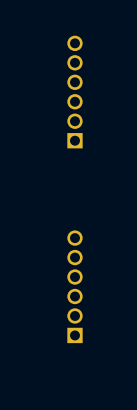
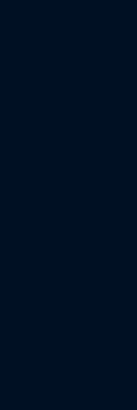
part: (74, 92) -> none
part: (74, 286) -> none

